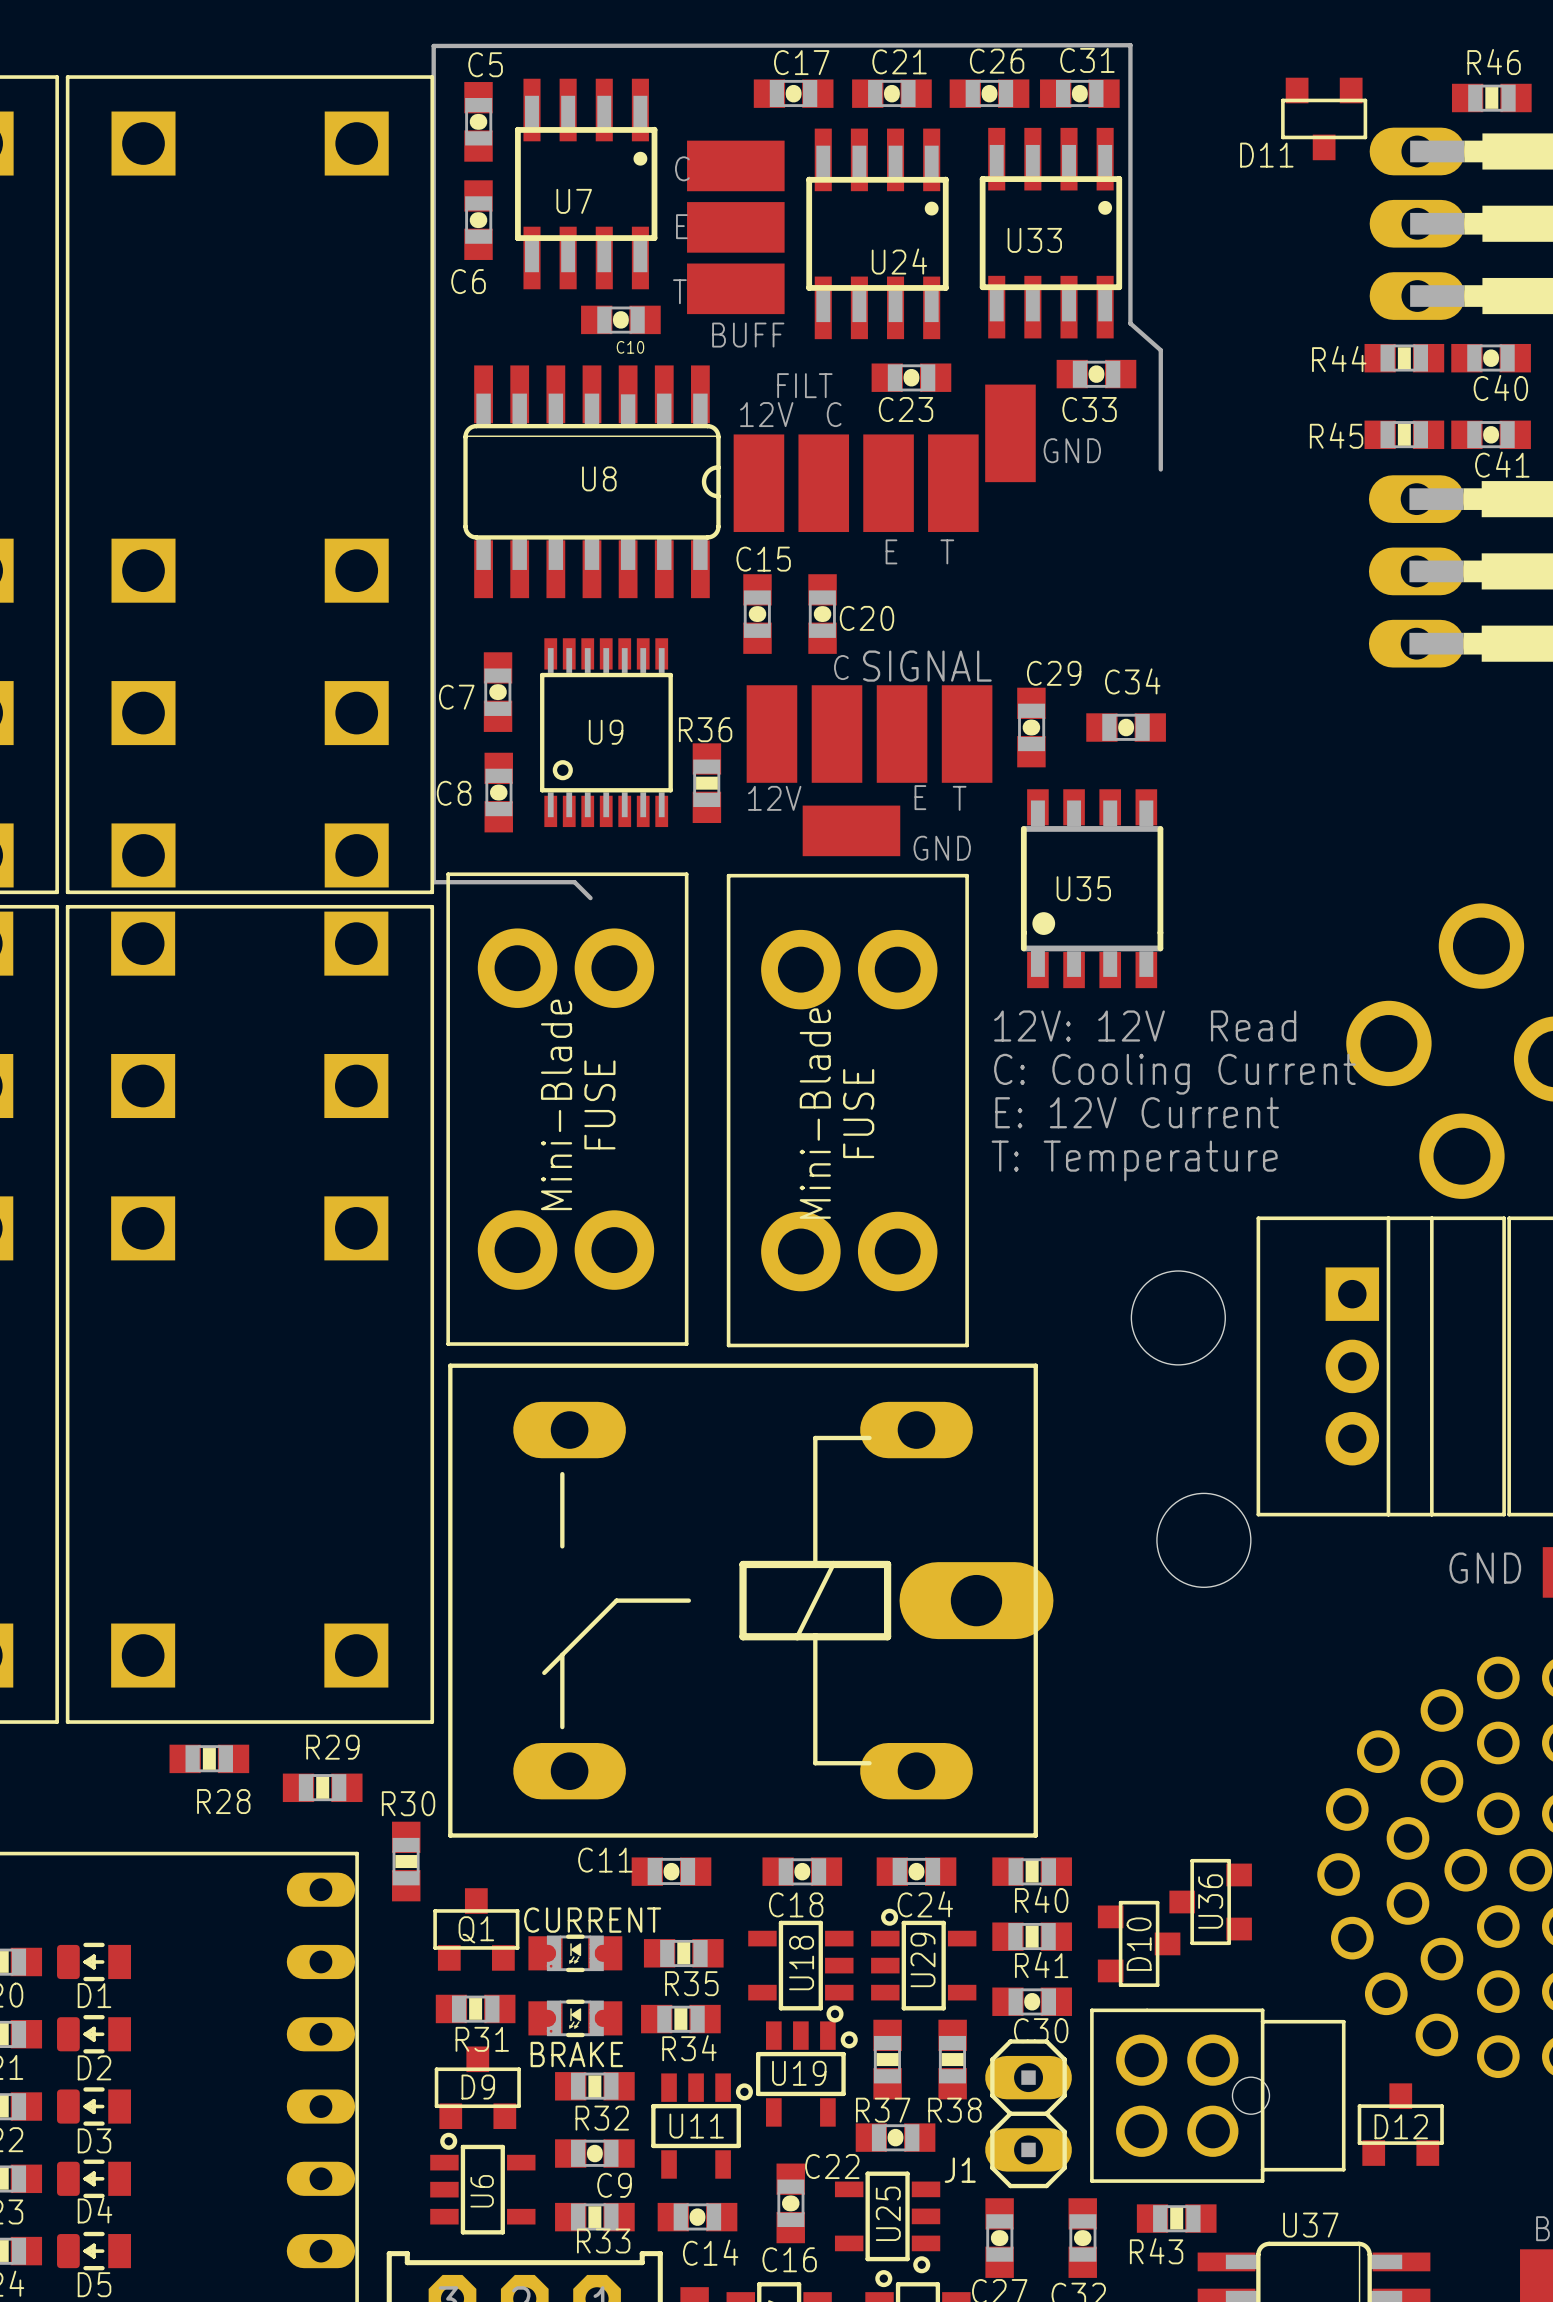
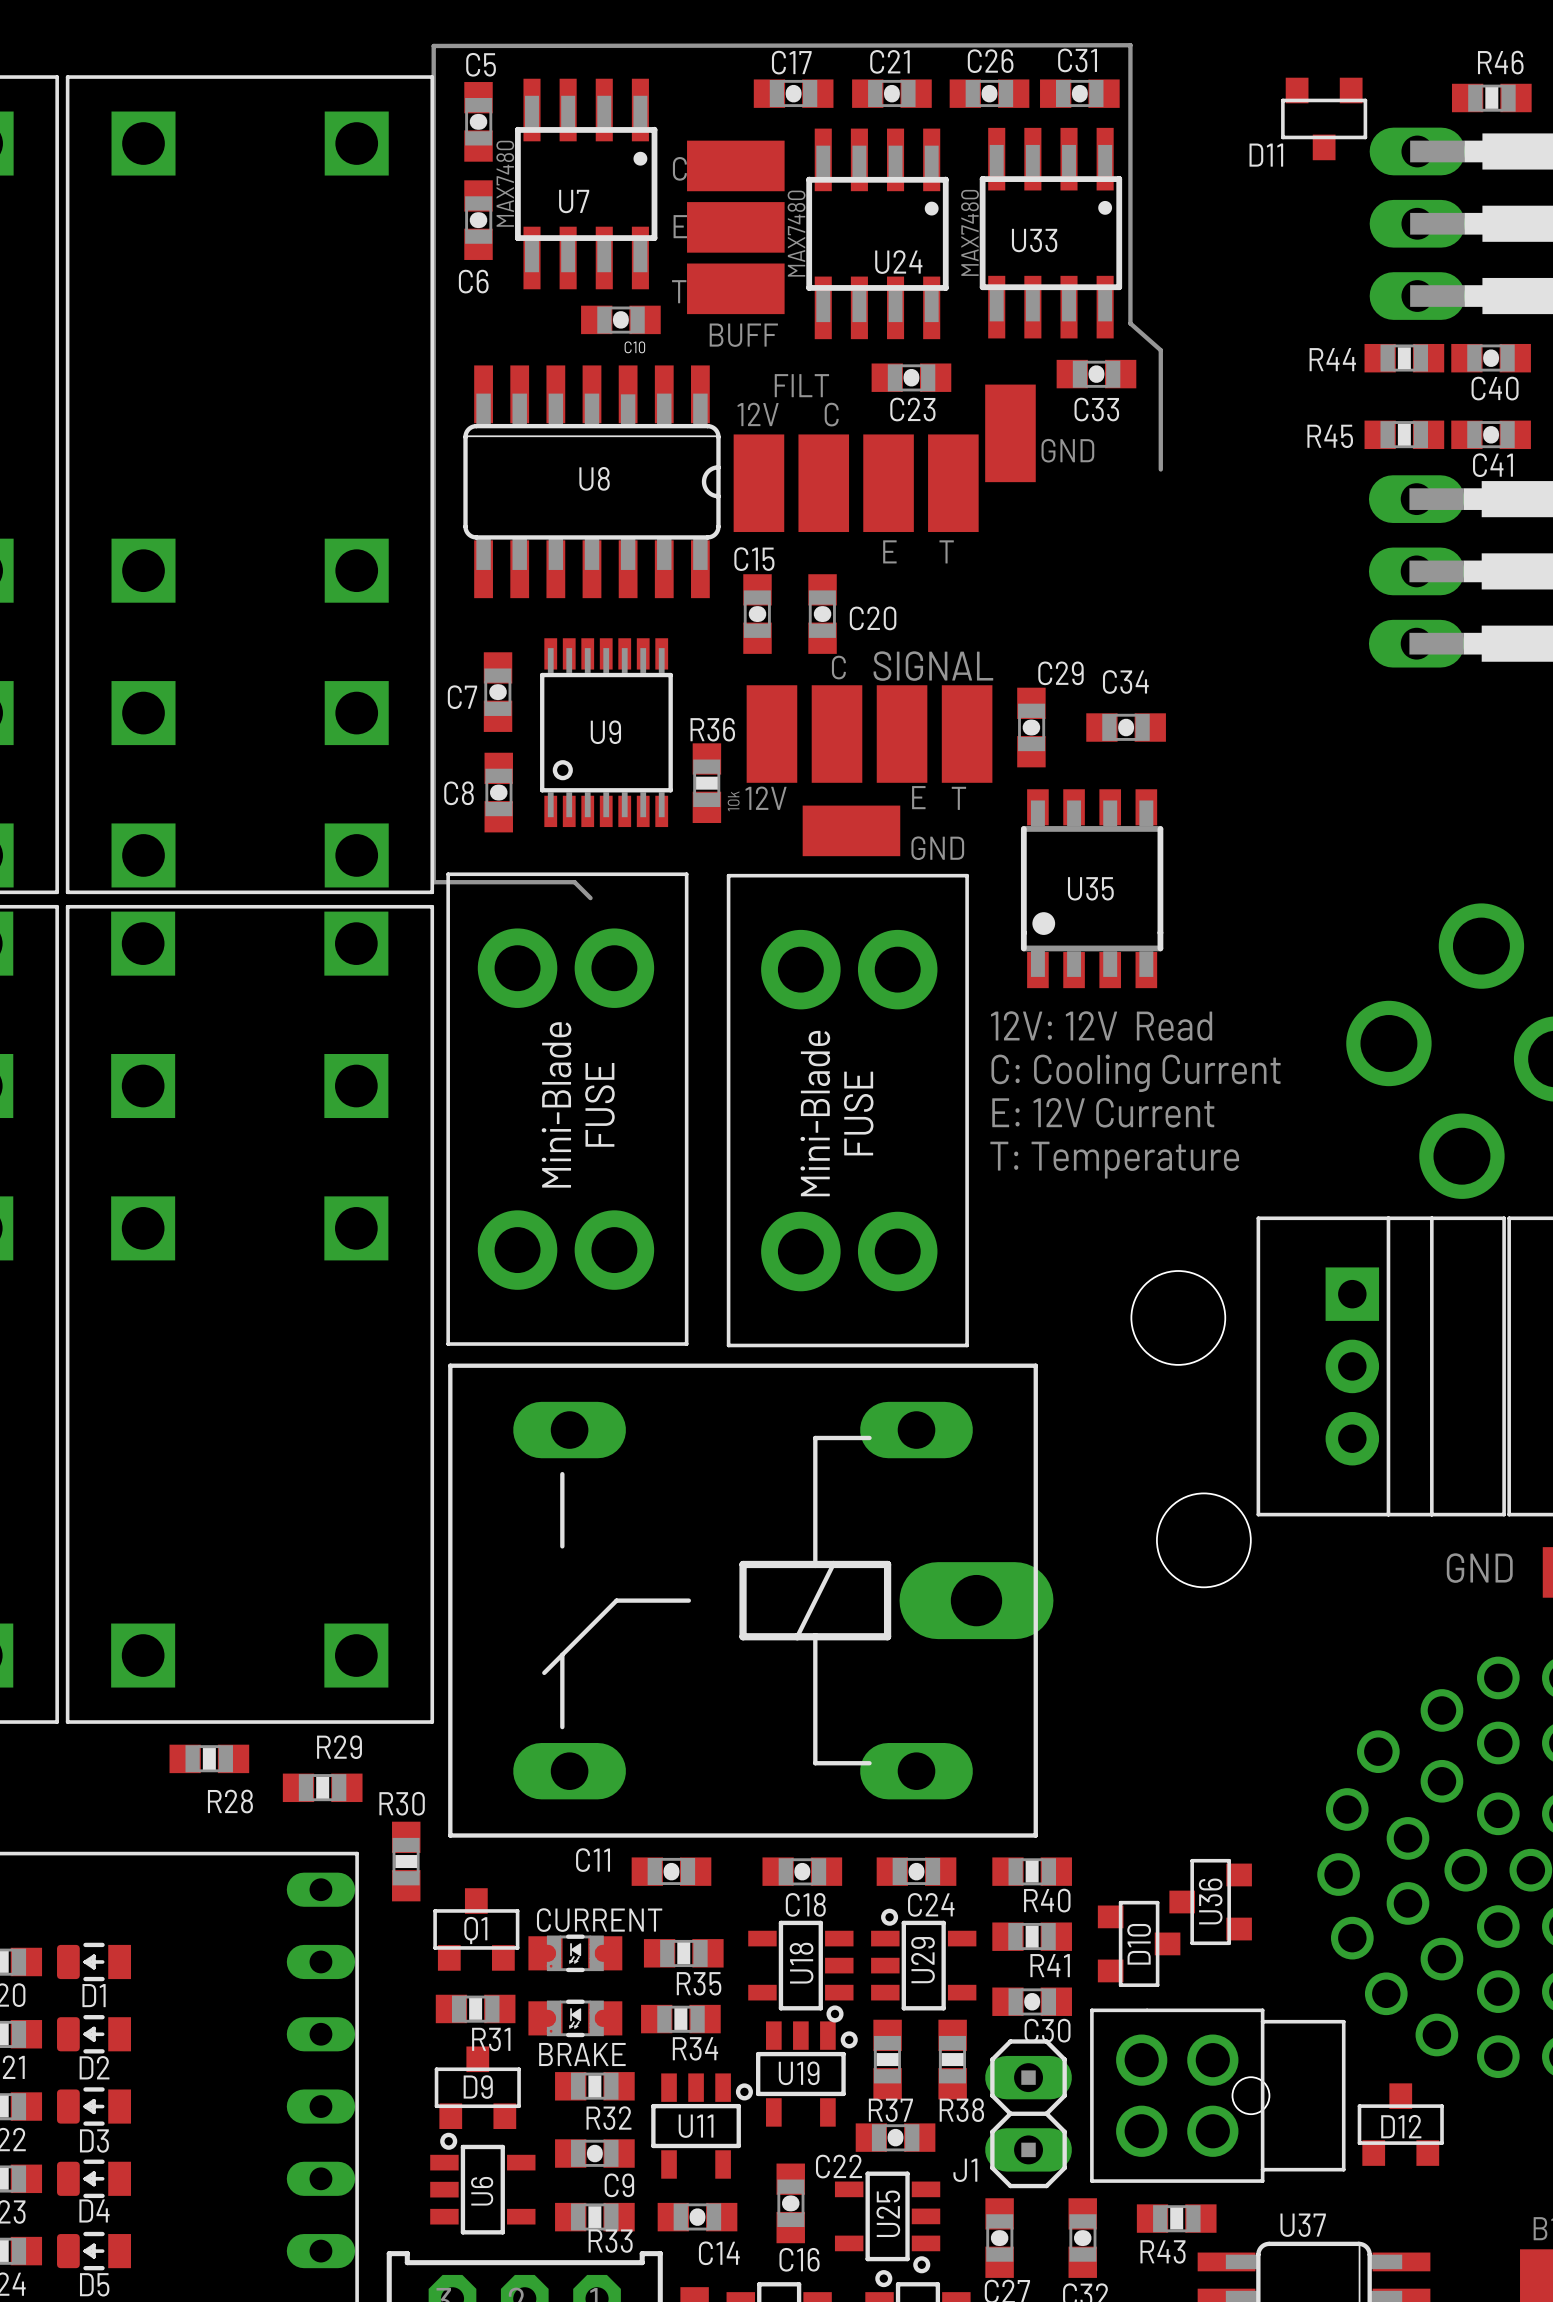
U7 value: none -> MAX7480 (505, 183)
U33 value: none -> MAX7480 (969, 232)
U24 value: none -> MAX7480 (796, 233)
R36 value: none -> 10k (733, 801)

